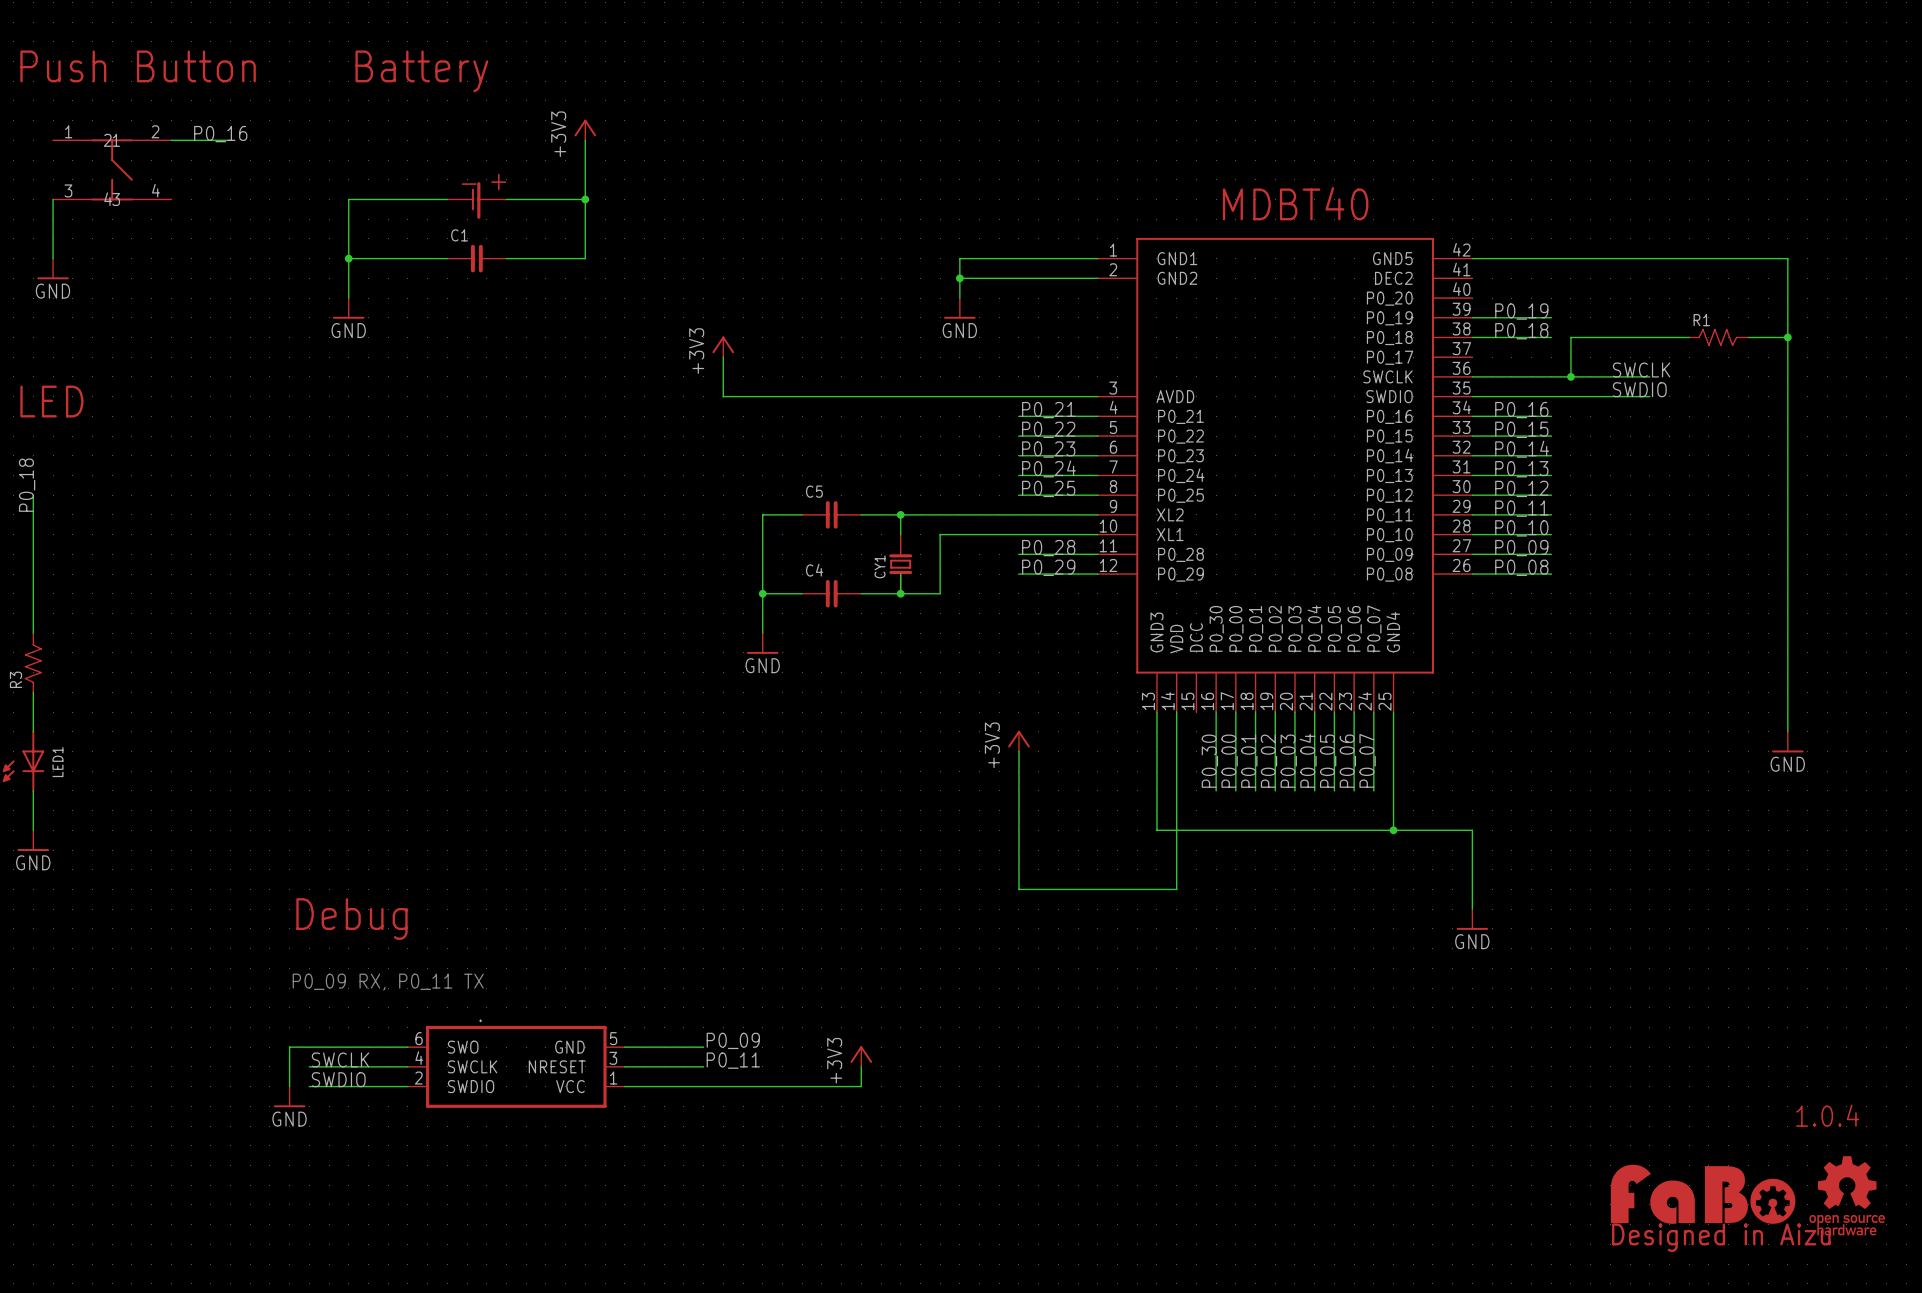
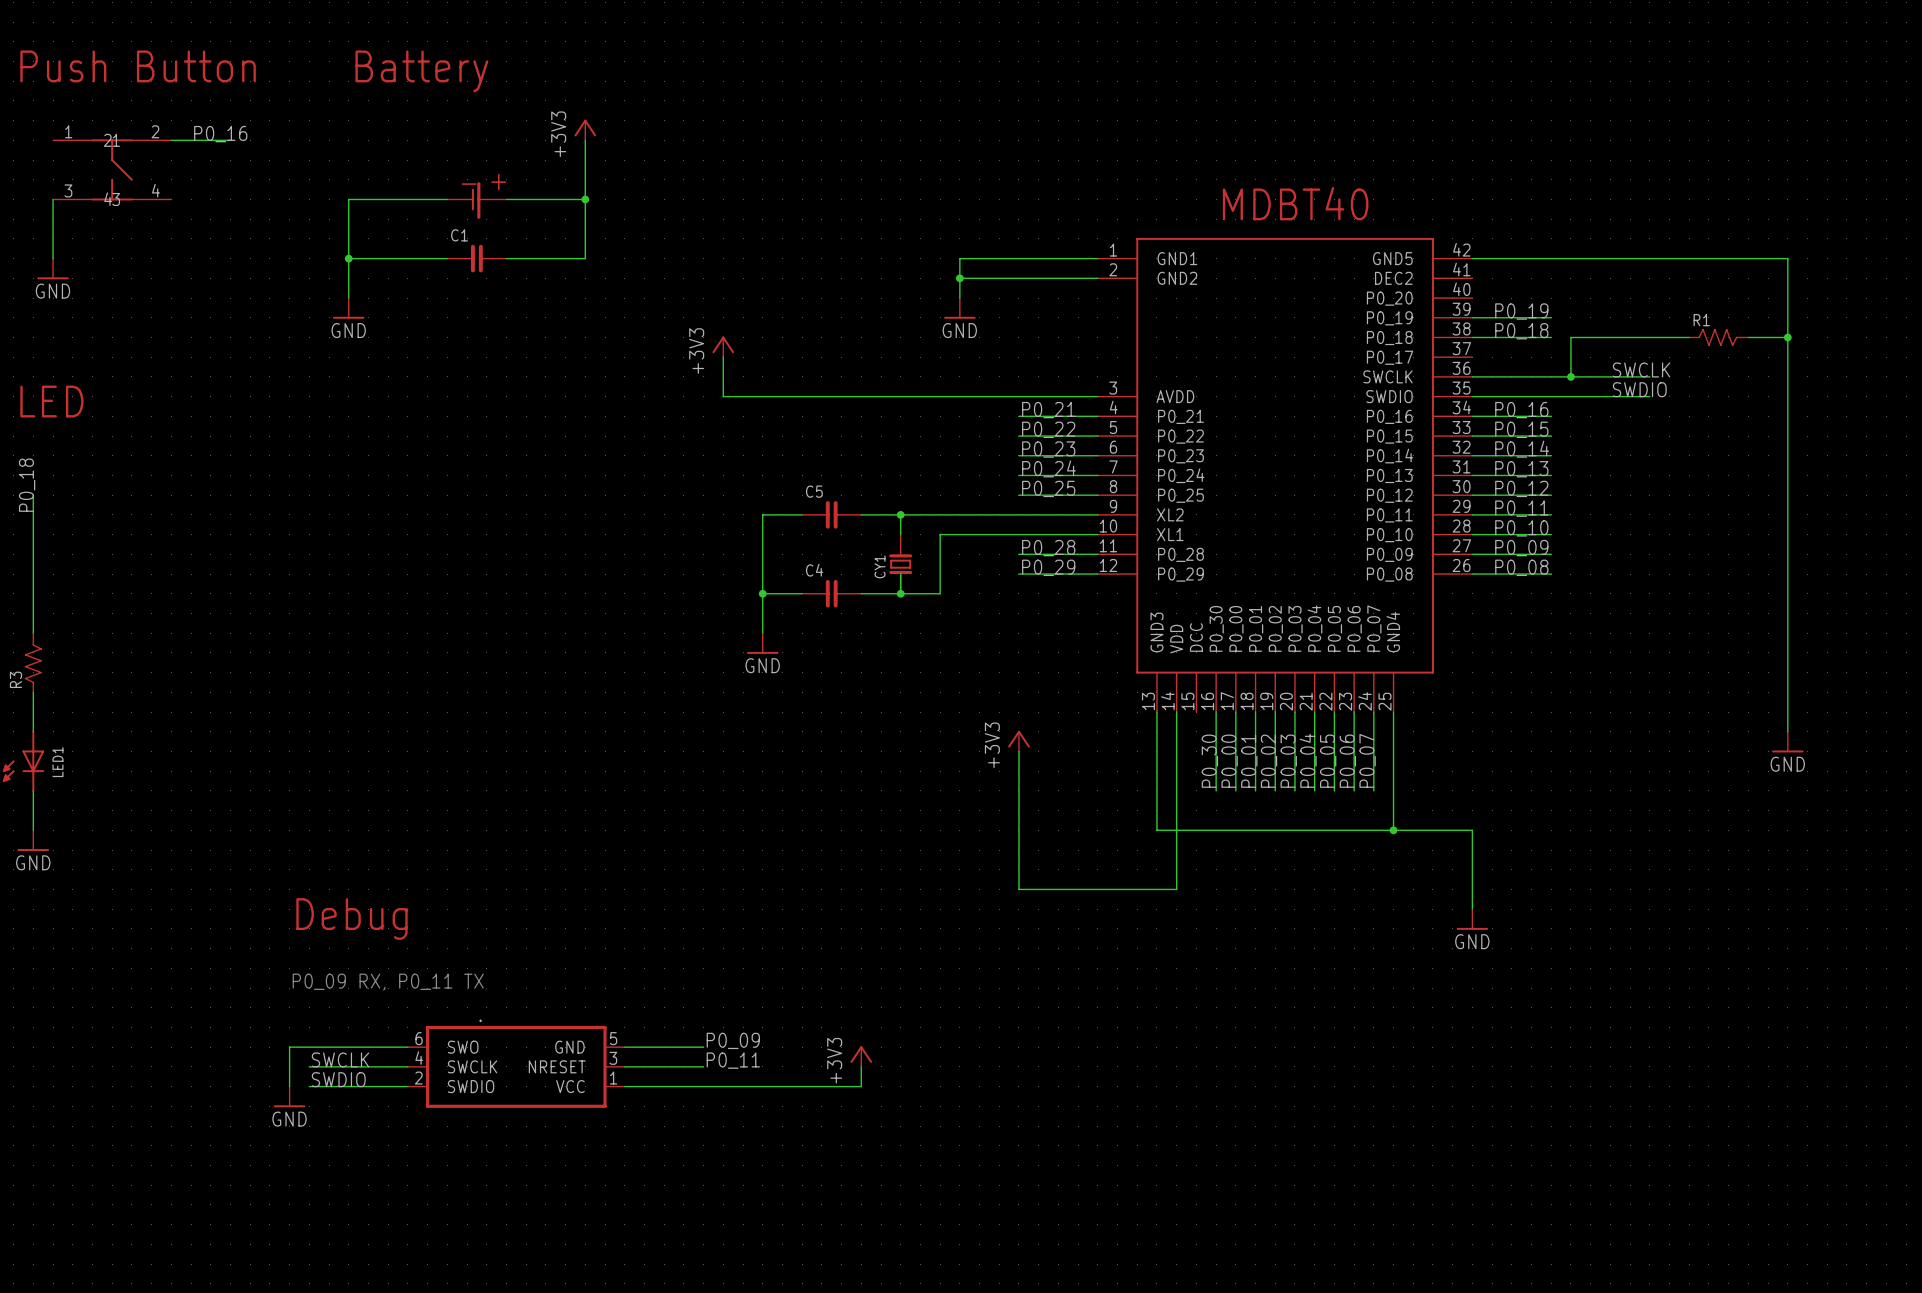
text: 1.0.4 (1827, 1115) -> none
part: (1703, 1194) -> none
part: (1847, 1195) -> none

